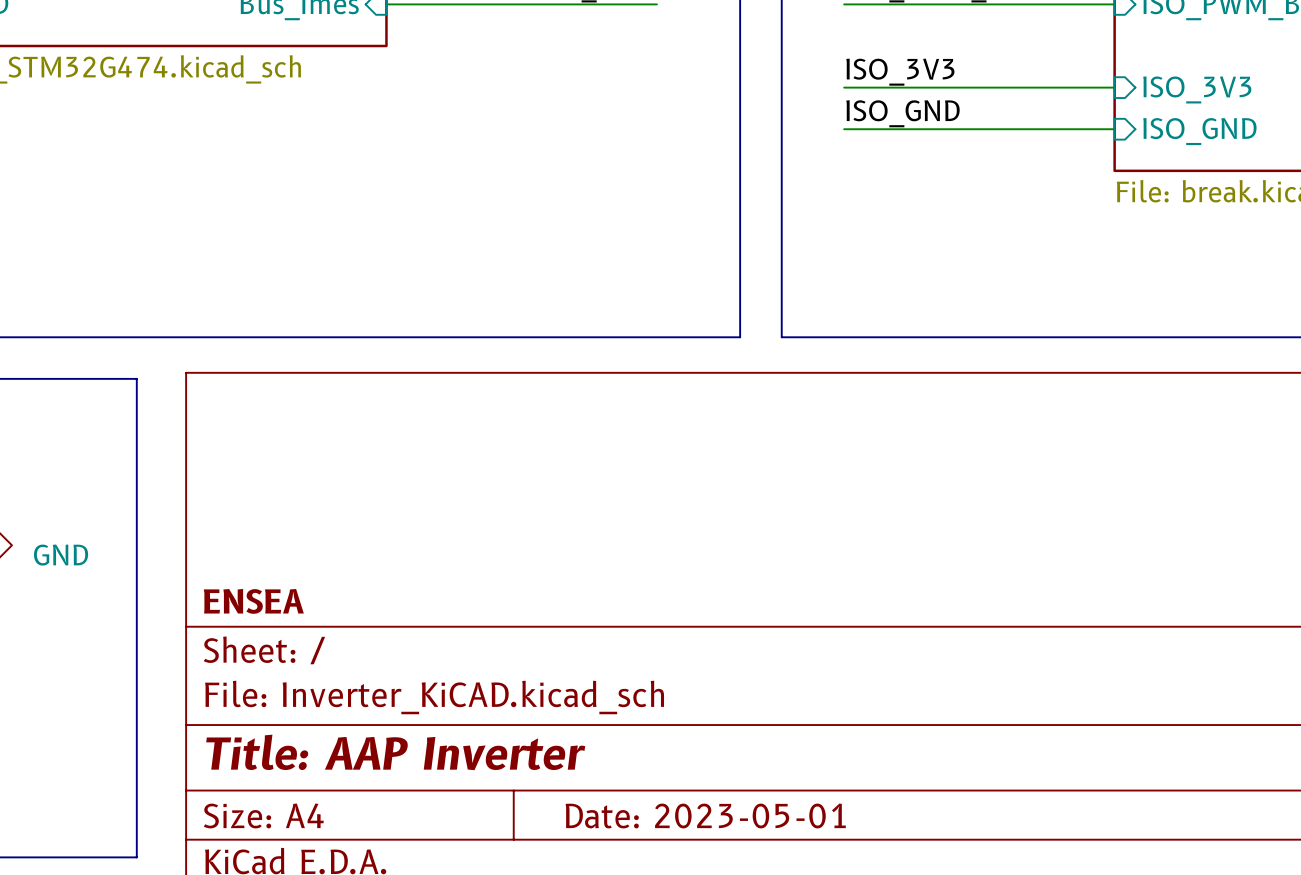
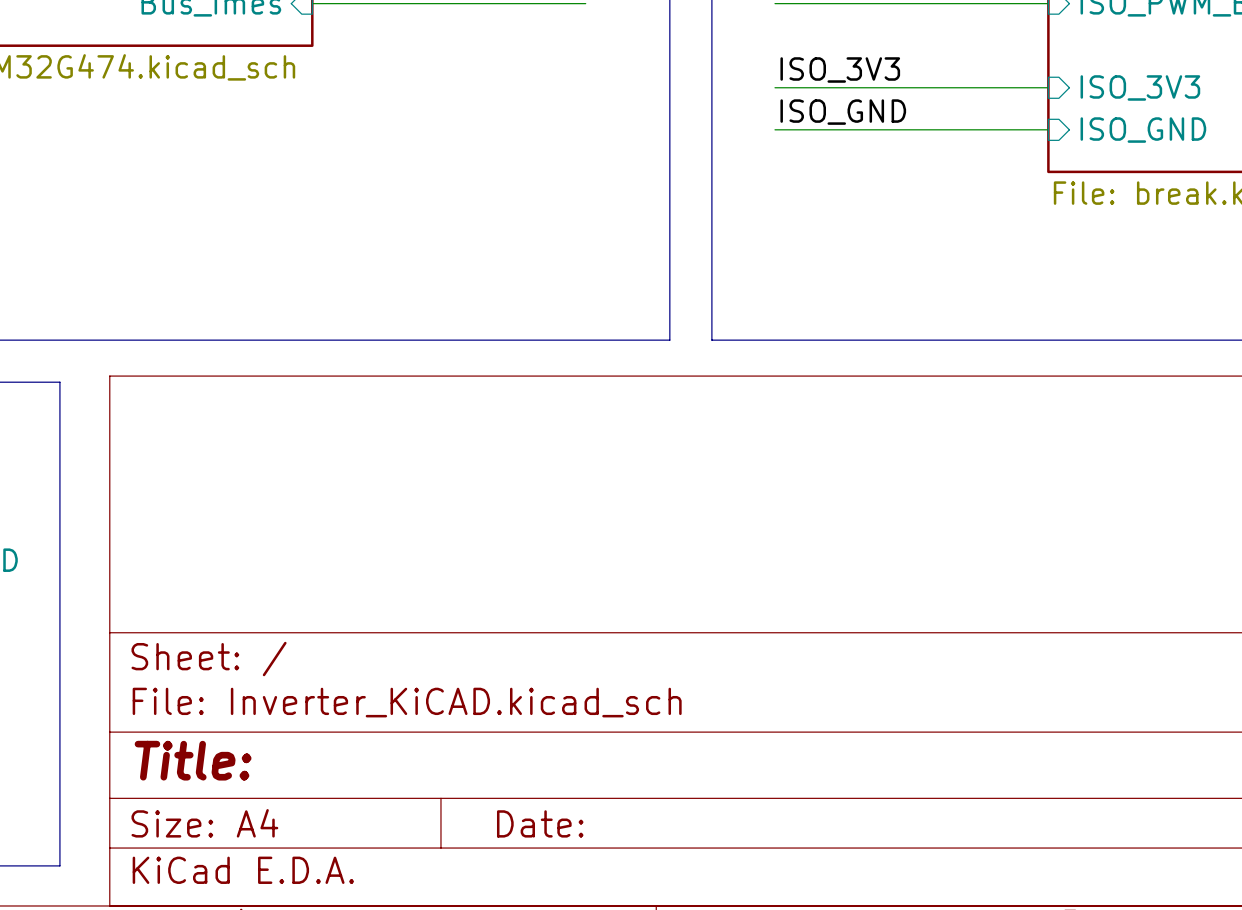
title block: ENSEA (253, 601) -> none
title block: Title: AAP Inverter (395, 752) -> Title: (193, 760)
title block: Date: 2023-05-01 (705, 815) -> Date: (540, 823)

